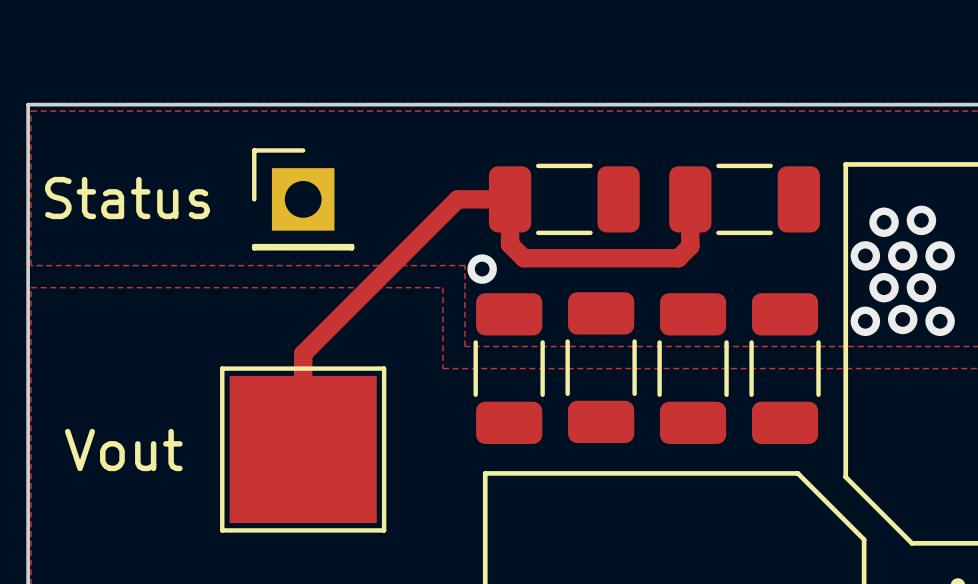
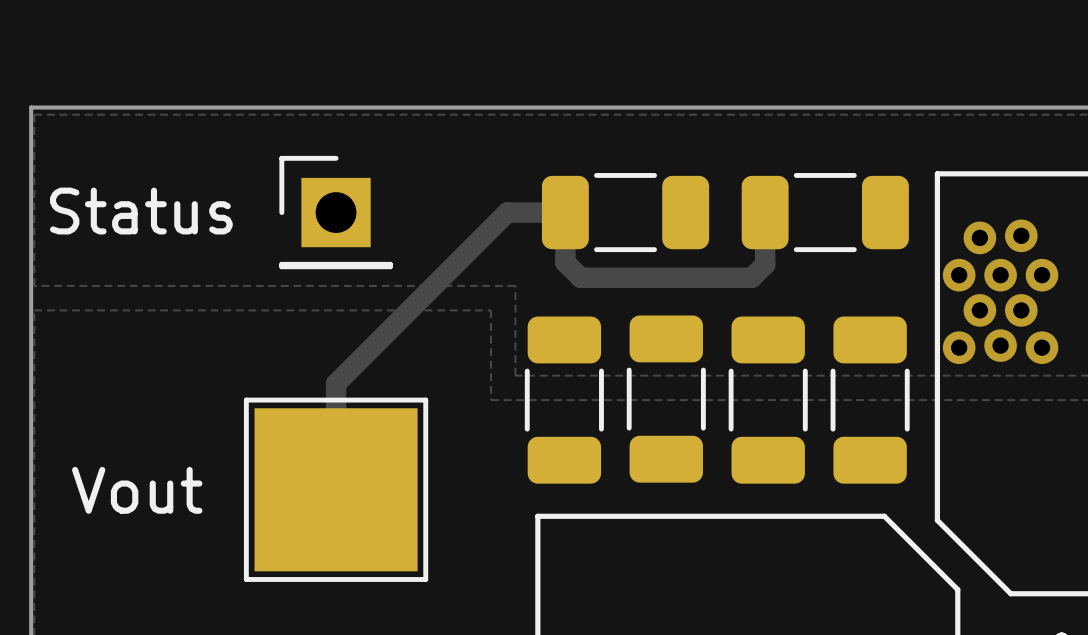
via: (482, 269) -> none

